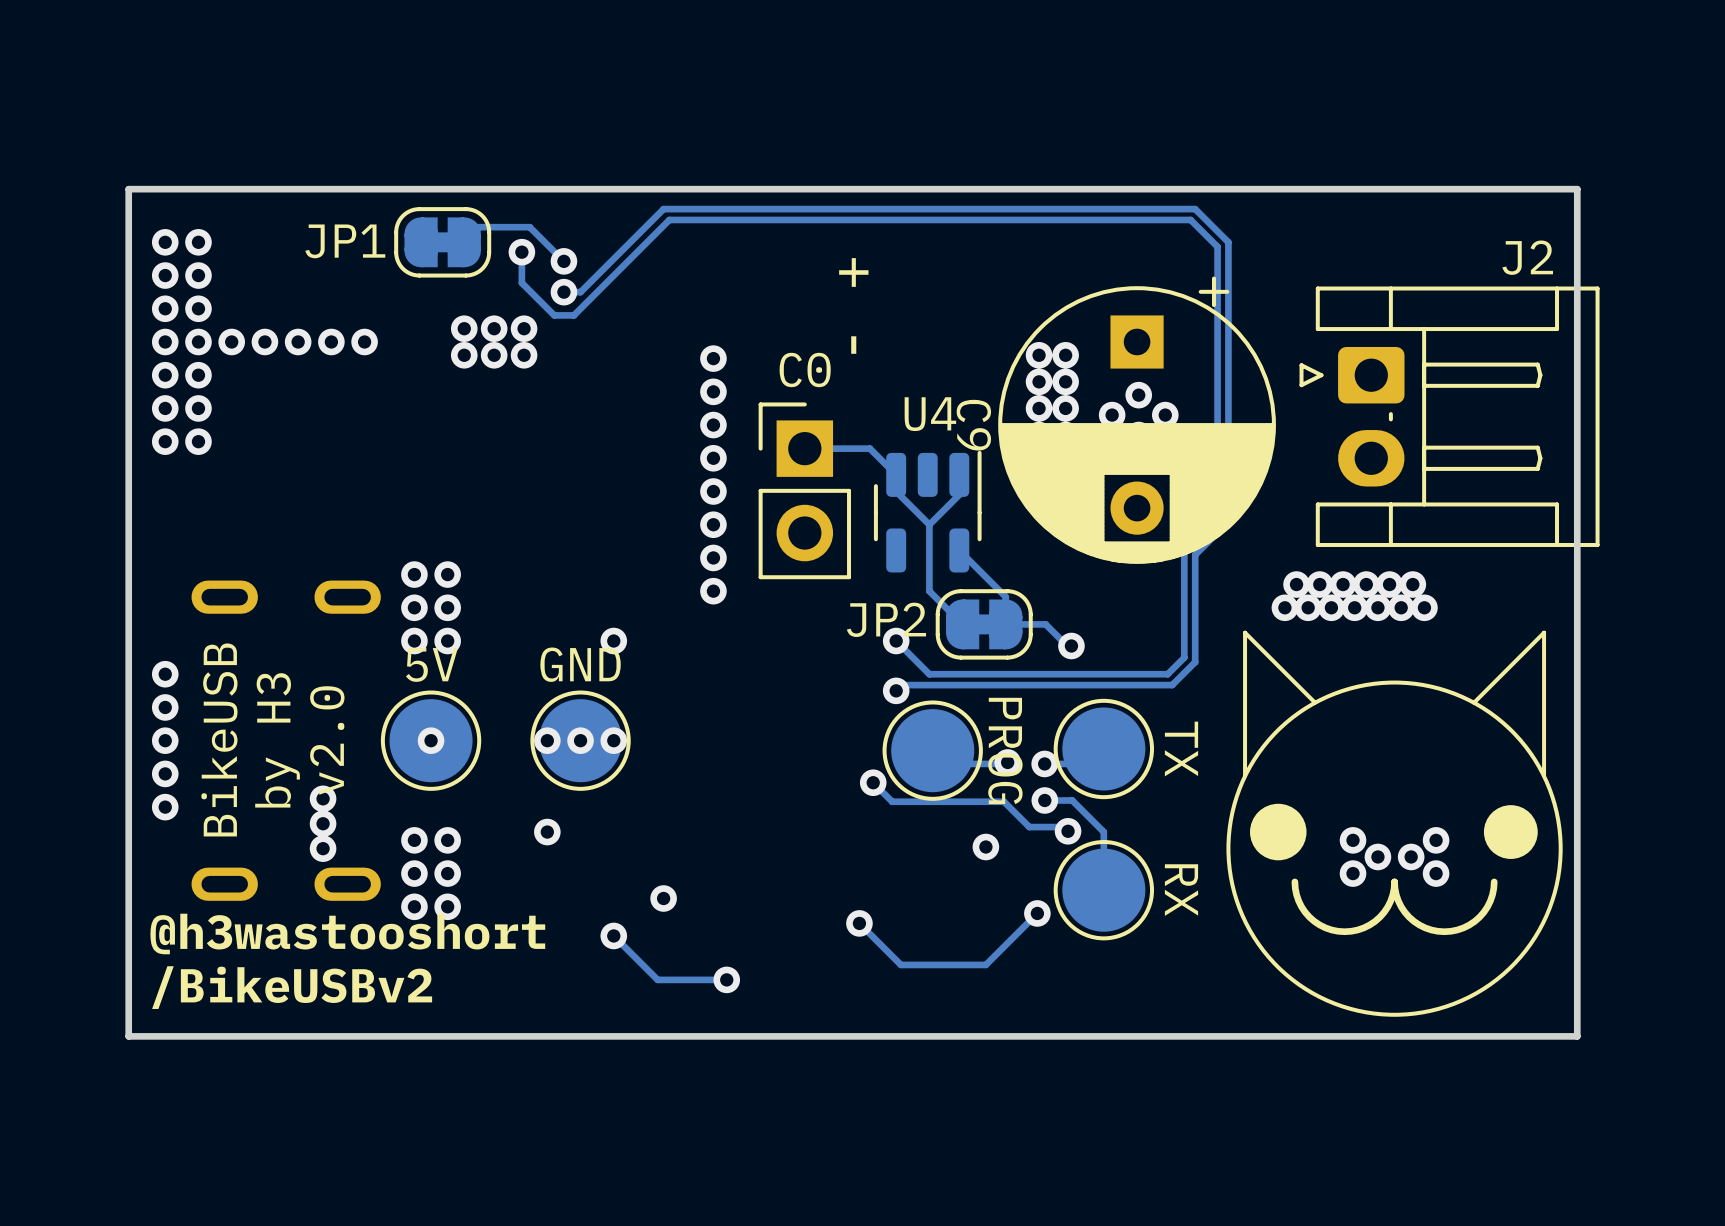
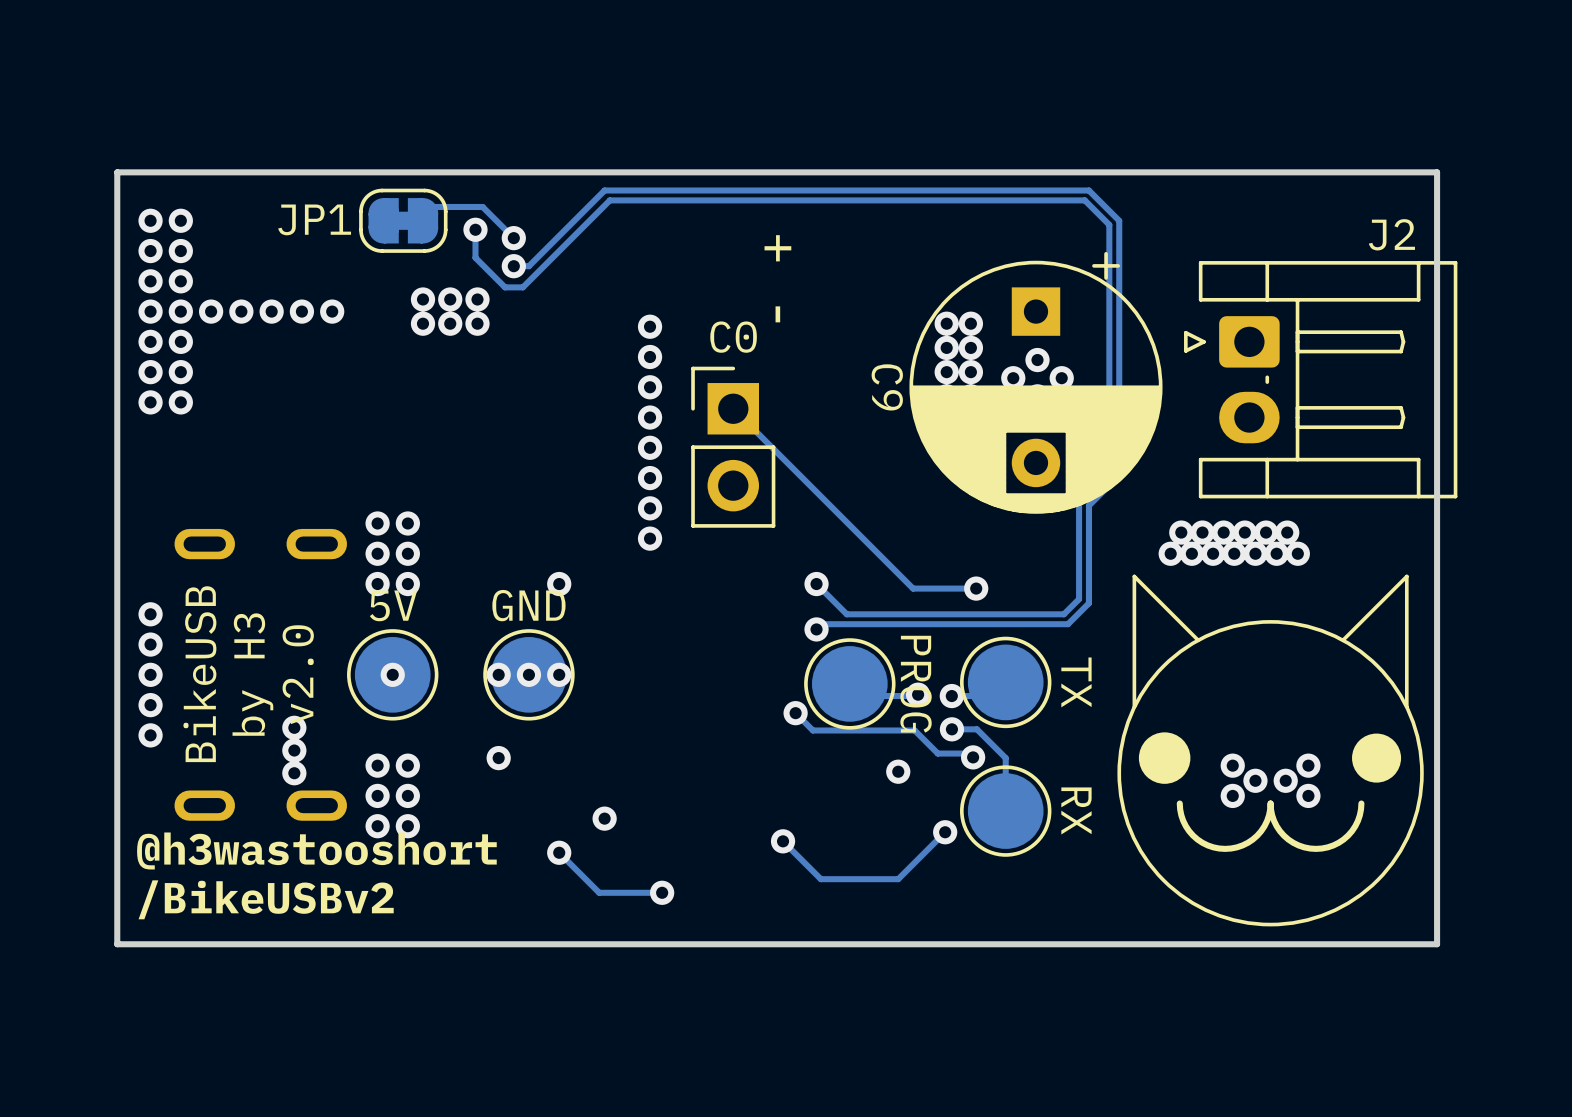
track: (804, 448) (869, 448) (896, 474) (896, 491) (929, 524) -> (733, 408) (913, 588) (972, 588)
track: (959, 474) (959, 494) (929, 524) -> none
U4: (927, 511) -> none
track: (929, 524) (929, 591) (962, 624) (962, 606) -> none
track: (959, 550) (1005, 596) (1005, 624) (1045, 624) (1067, 646) -> none
JP2: (984, 624) -> none

